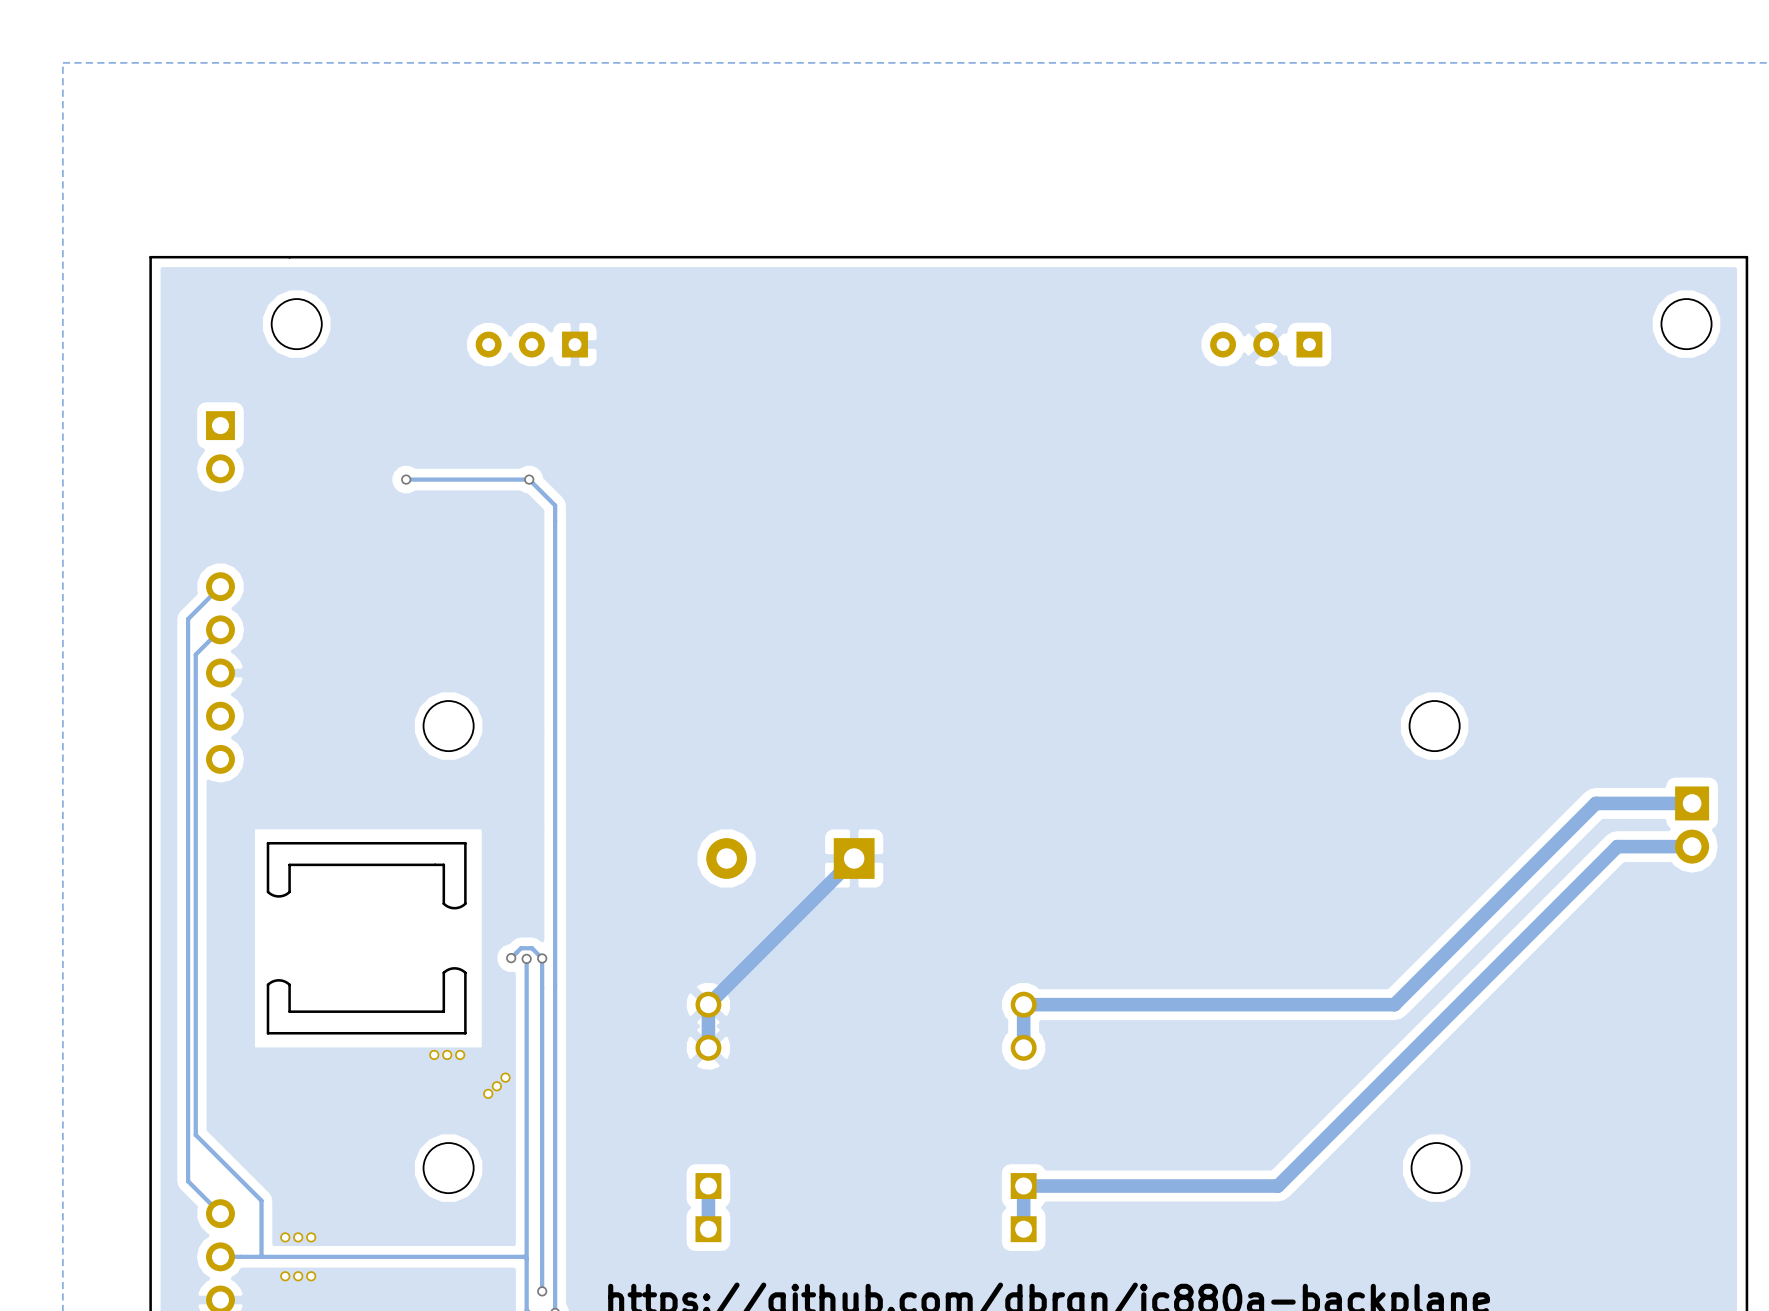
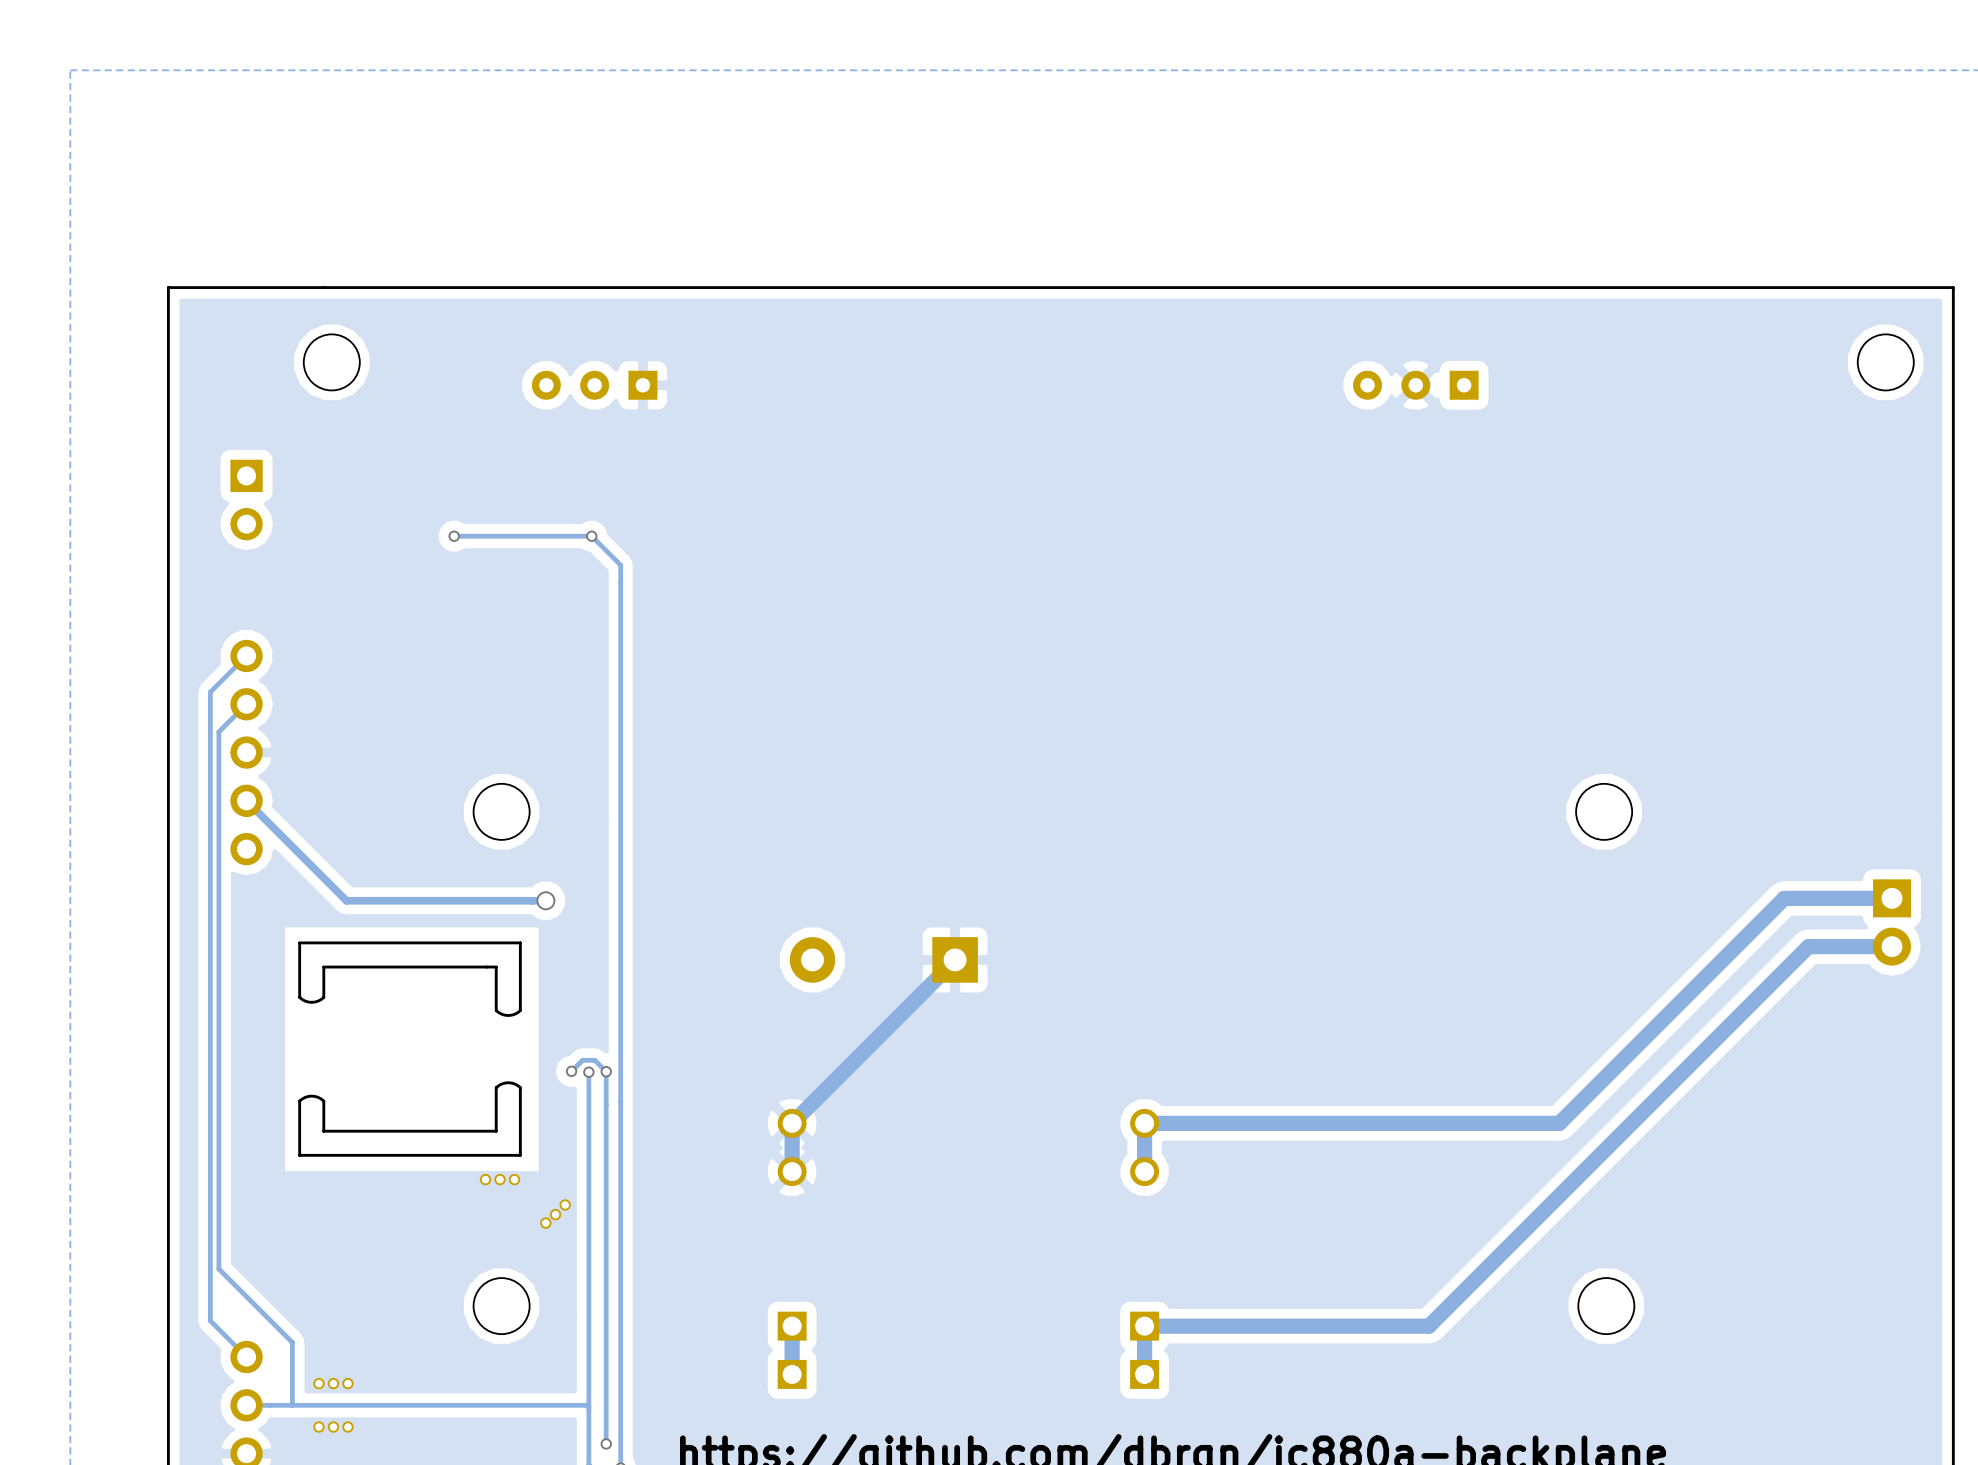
track: none -> (246, 800) (346, 900) (545, 900)
via: none -> (545, 900)

